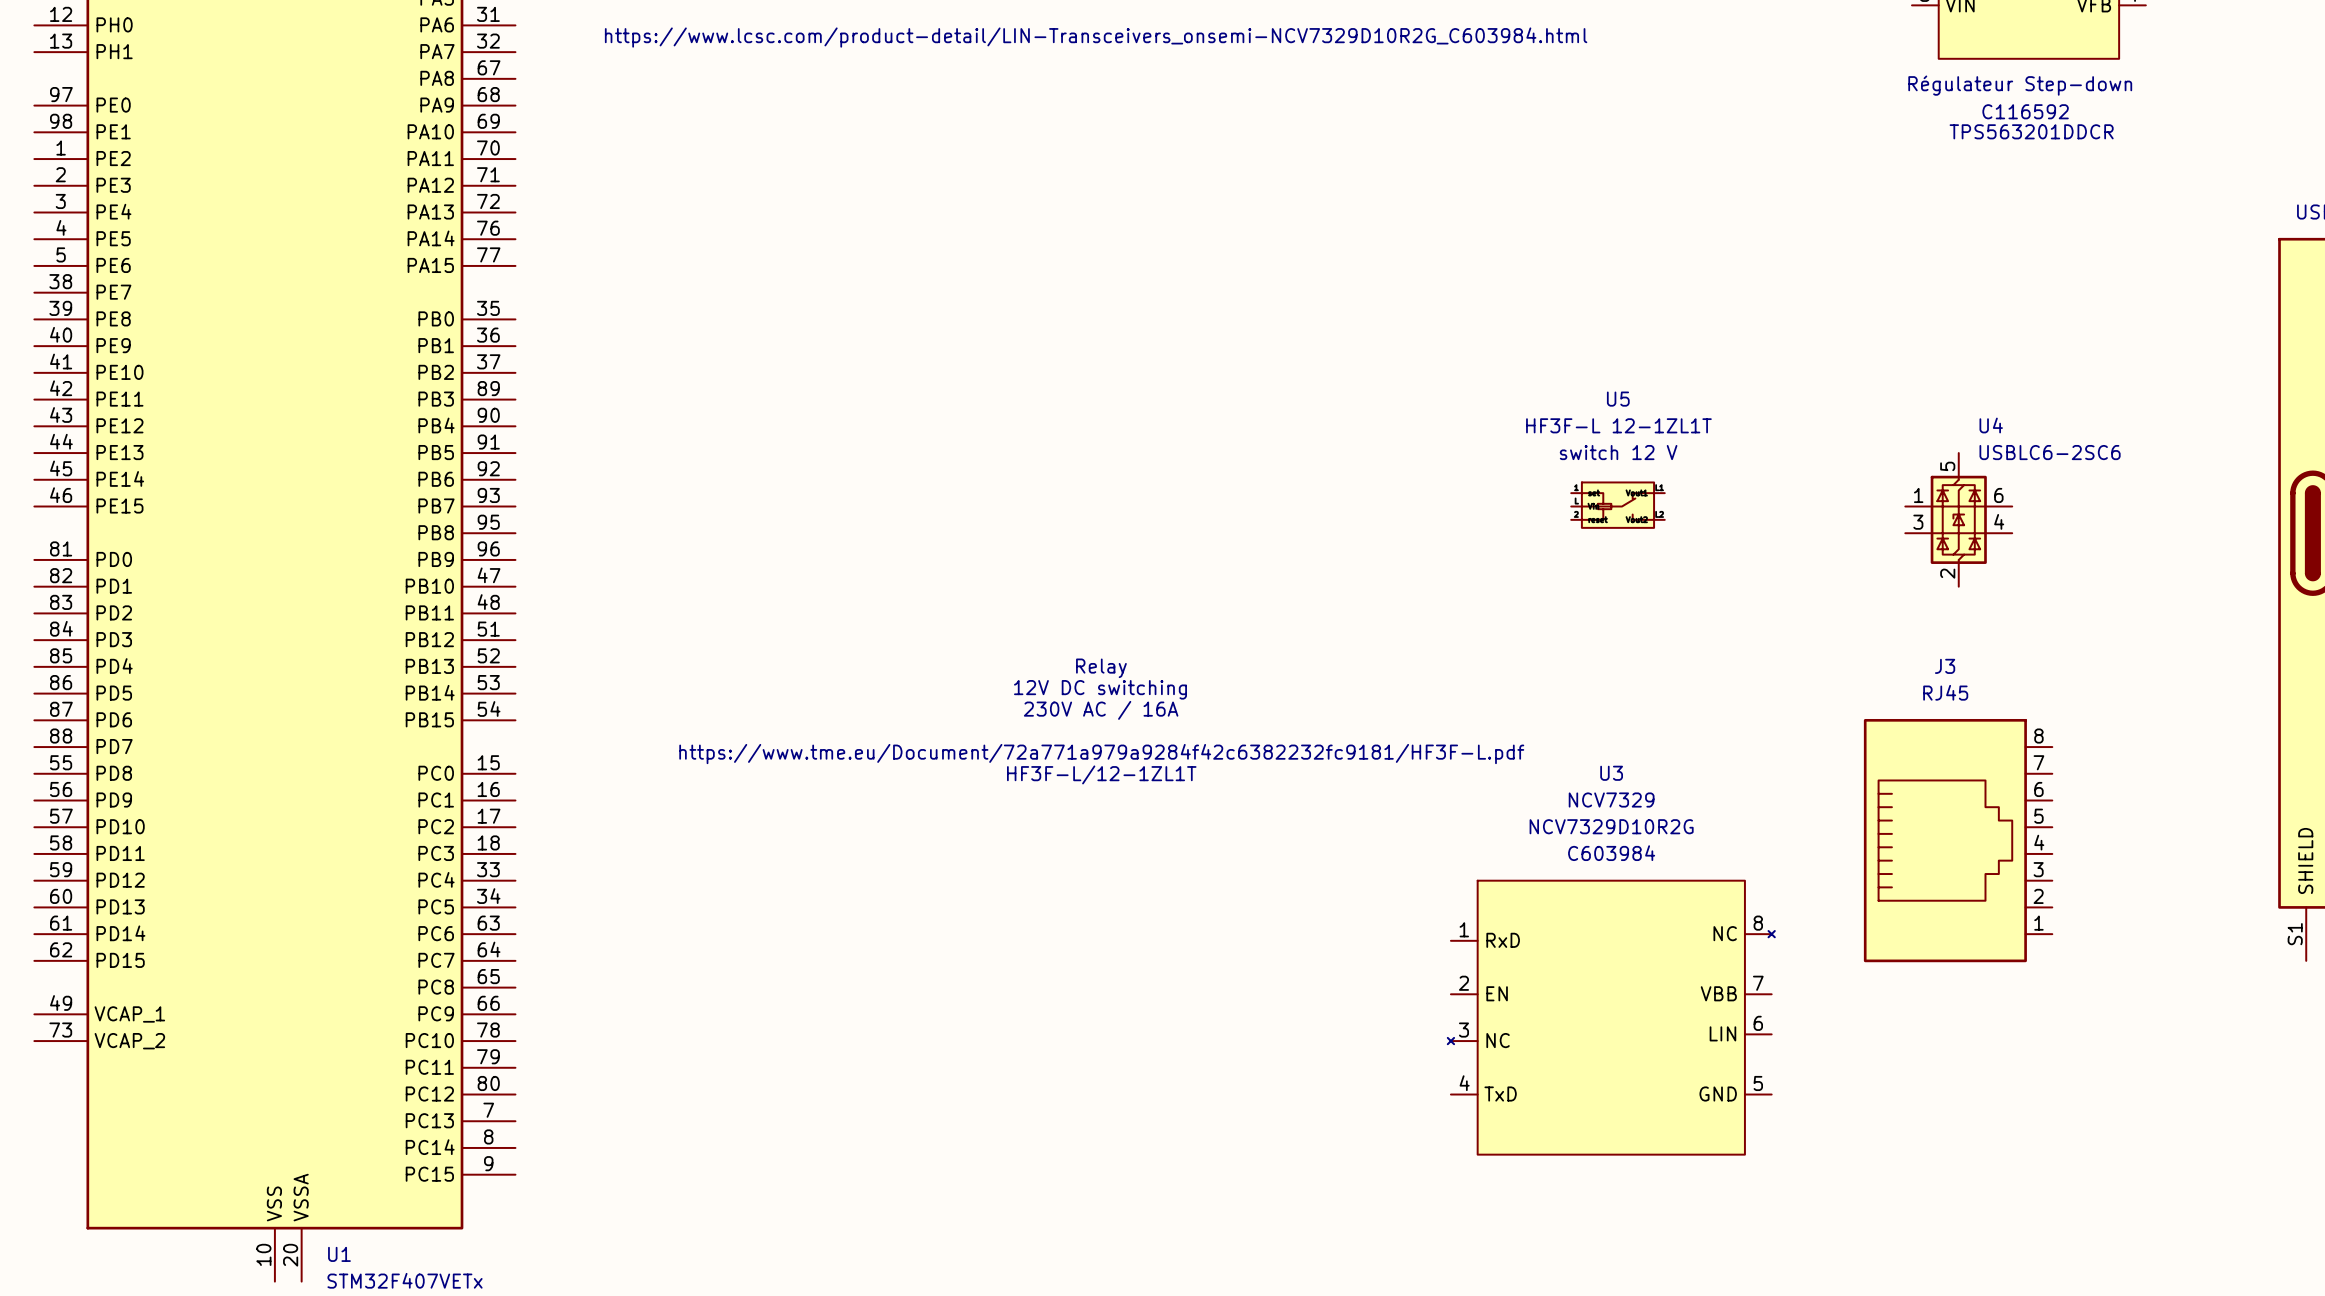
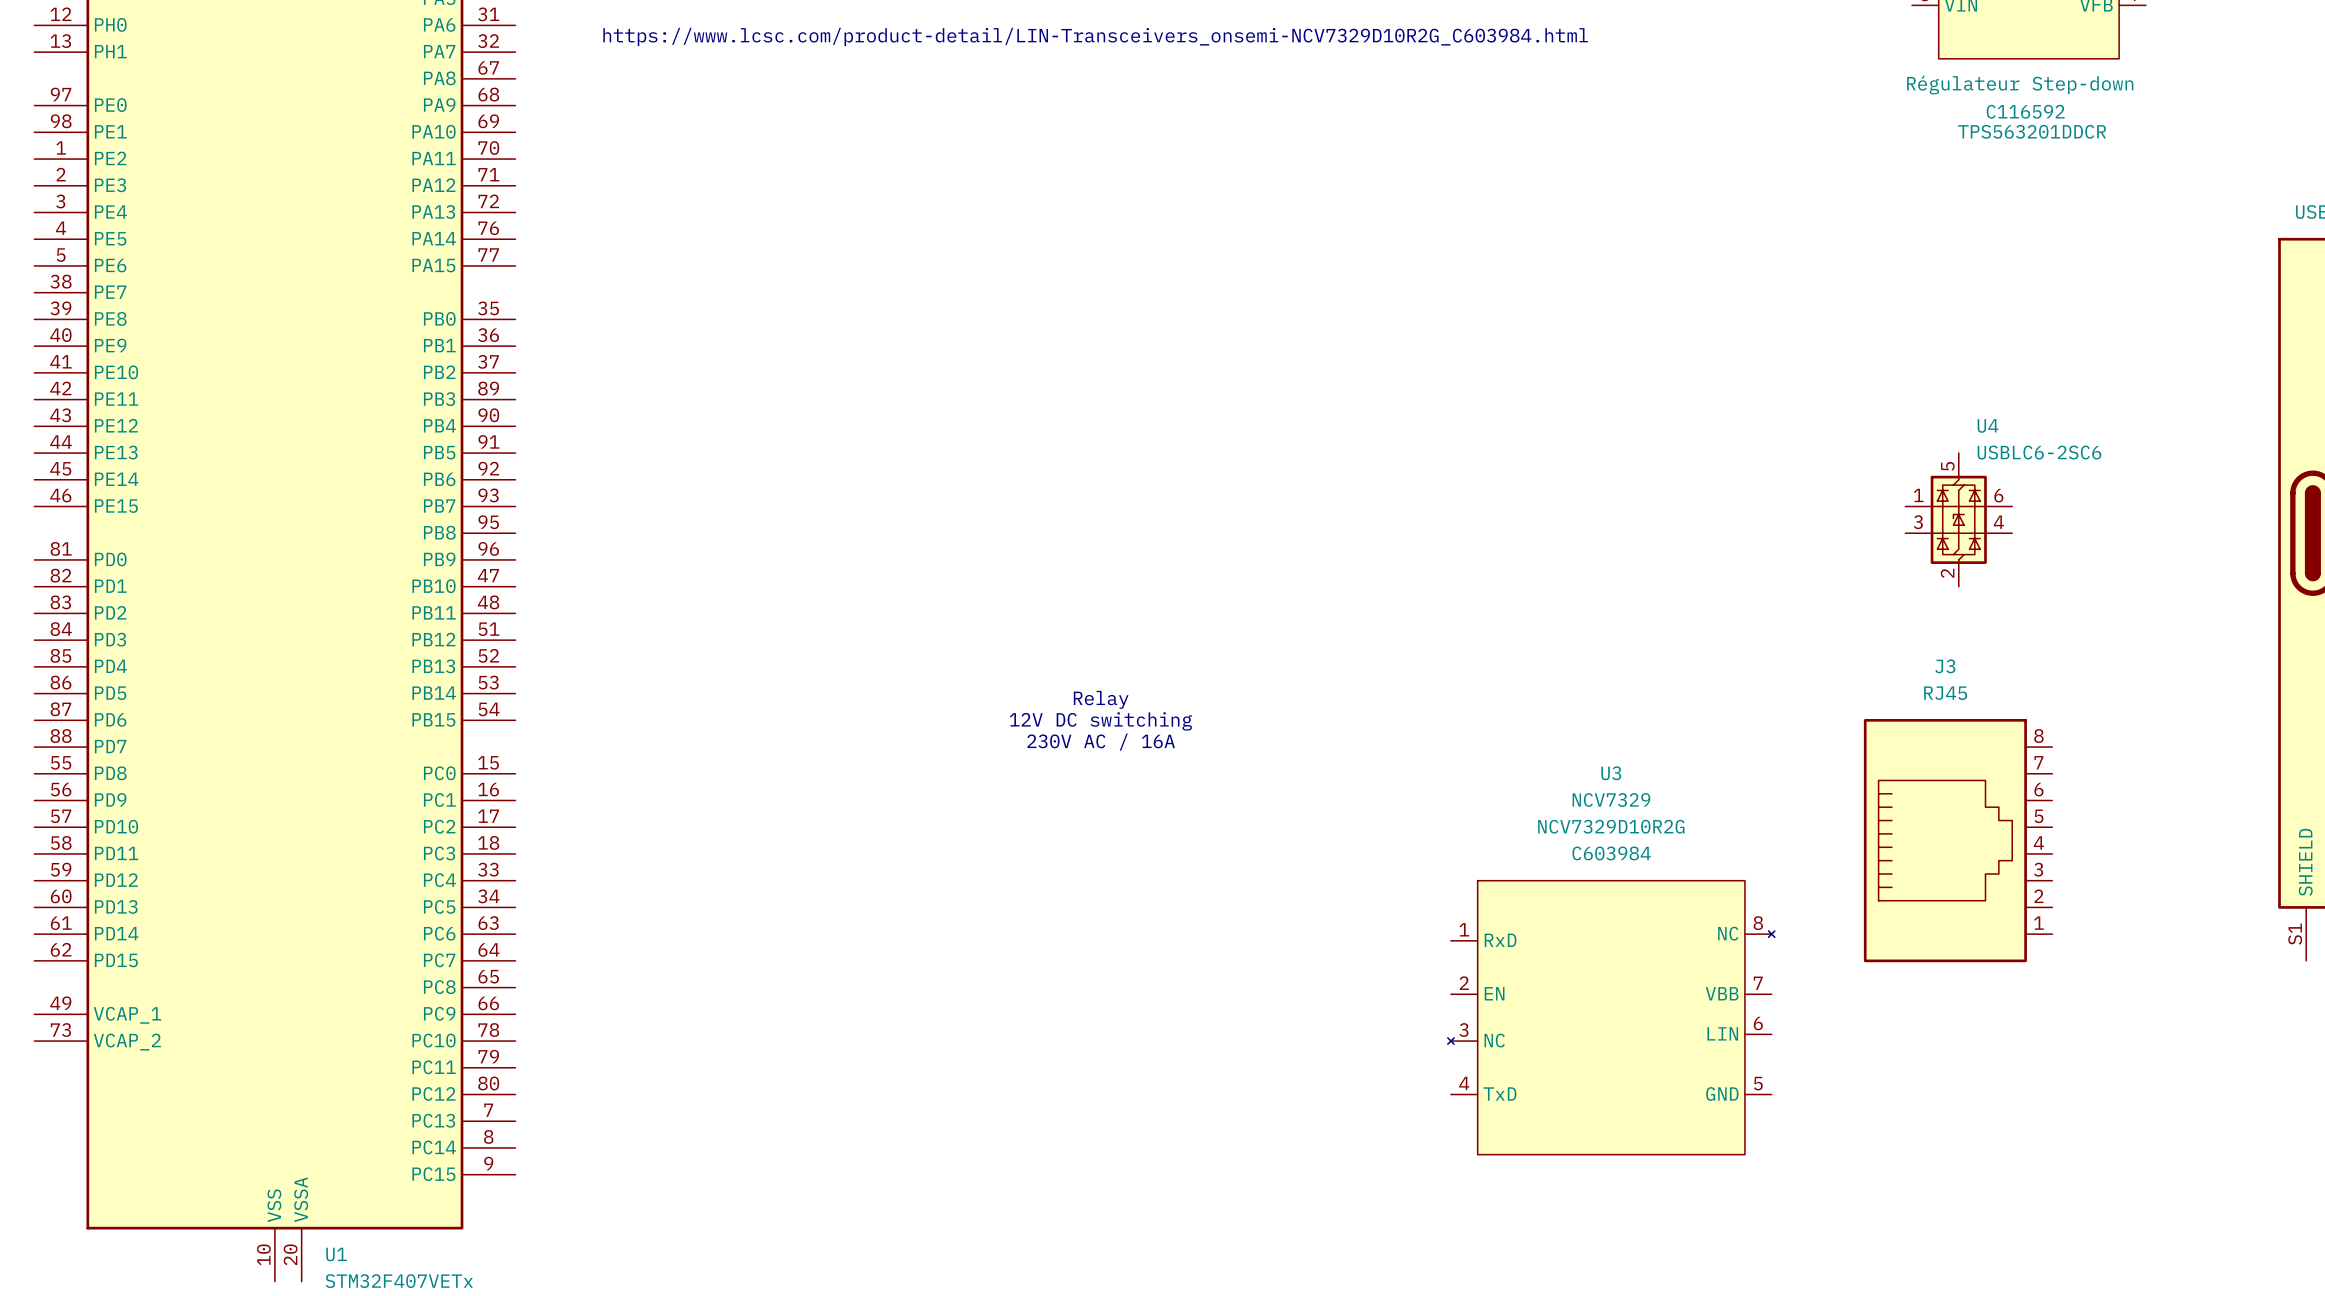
U5: HF3F-L 12-1ZL1T (1617, 505) -> none
text position: Relay (1101, 668) -> Relay (1101, 699)
text position: 12V DC switching (1100, 689) -> 12V DC switching (1100, 721)
text position: 230V AC / 16A (1101, 710) -> 230V AC / 16A (1101, 742)
text: https://www.tme.eu/Document/72a771a979a9284f42c6382232fc9181/HF3F-L.pdf (1101, 754) -> none
text: HF3F-L/12-1ZL1T (1101, 774) -> none

